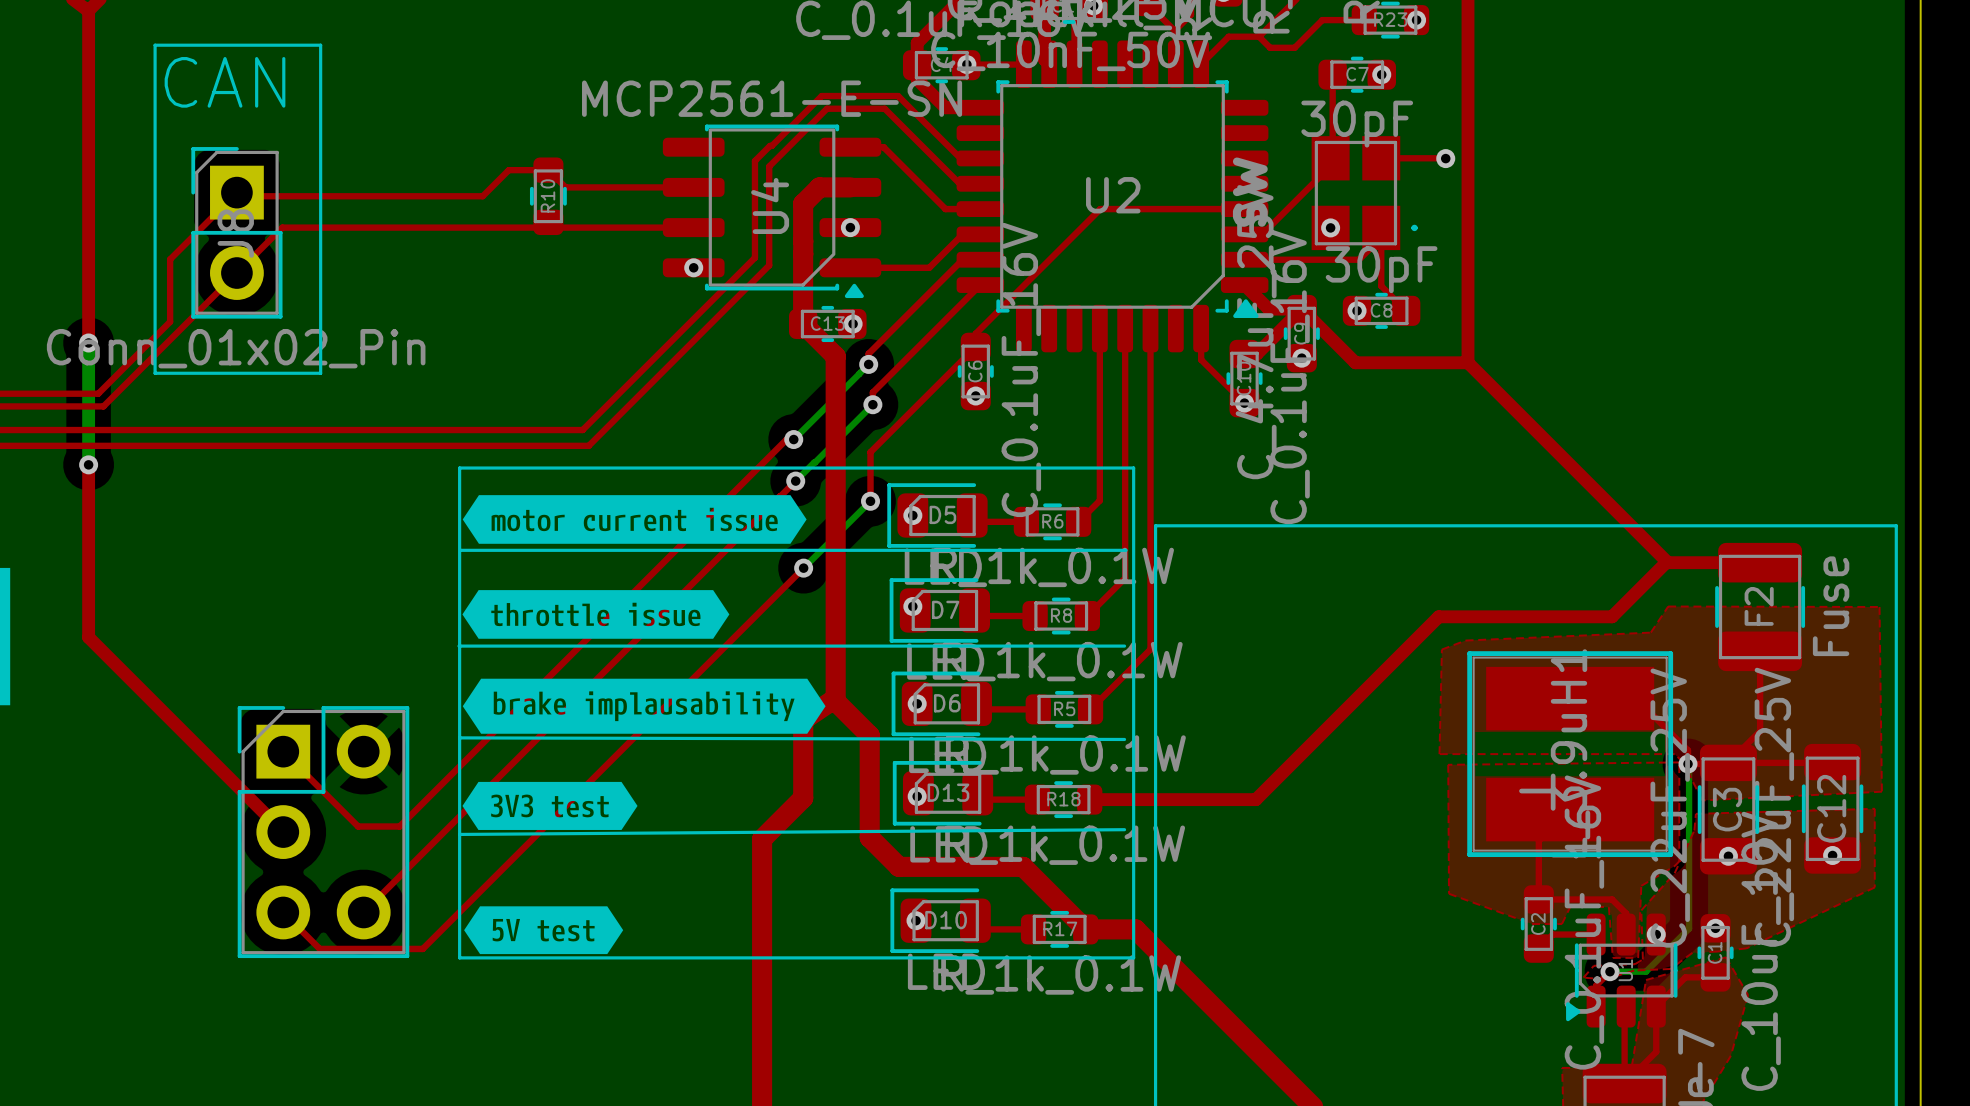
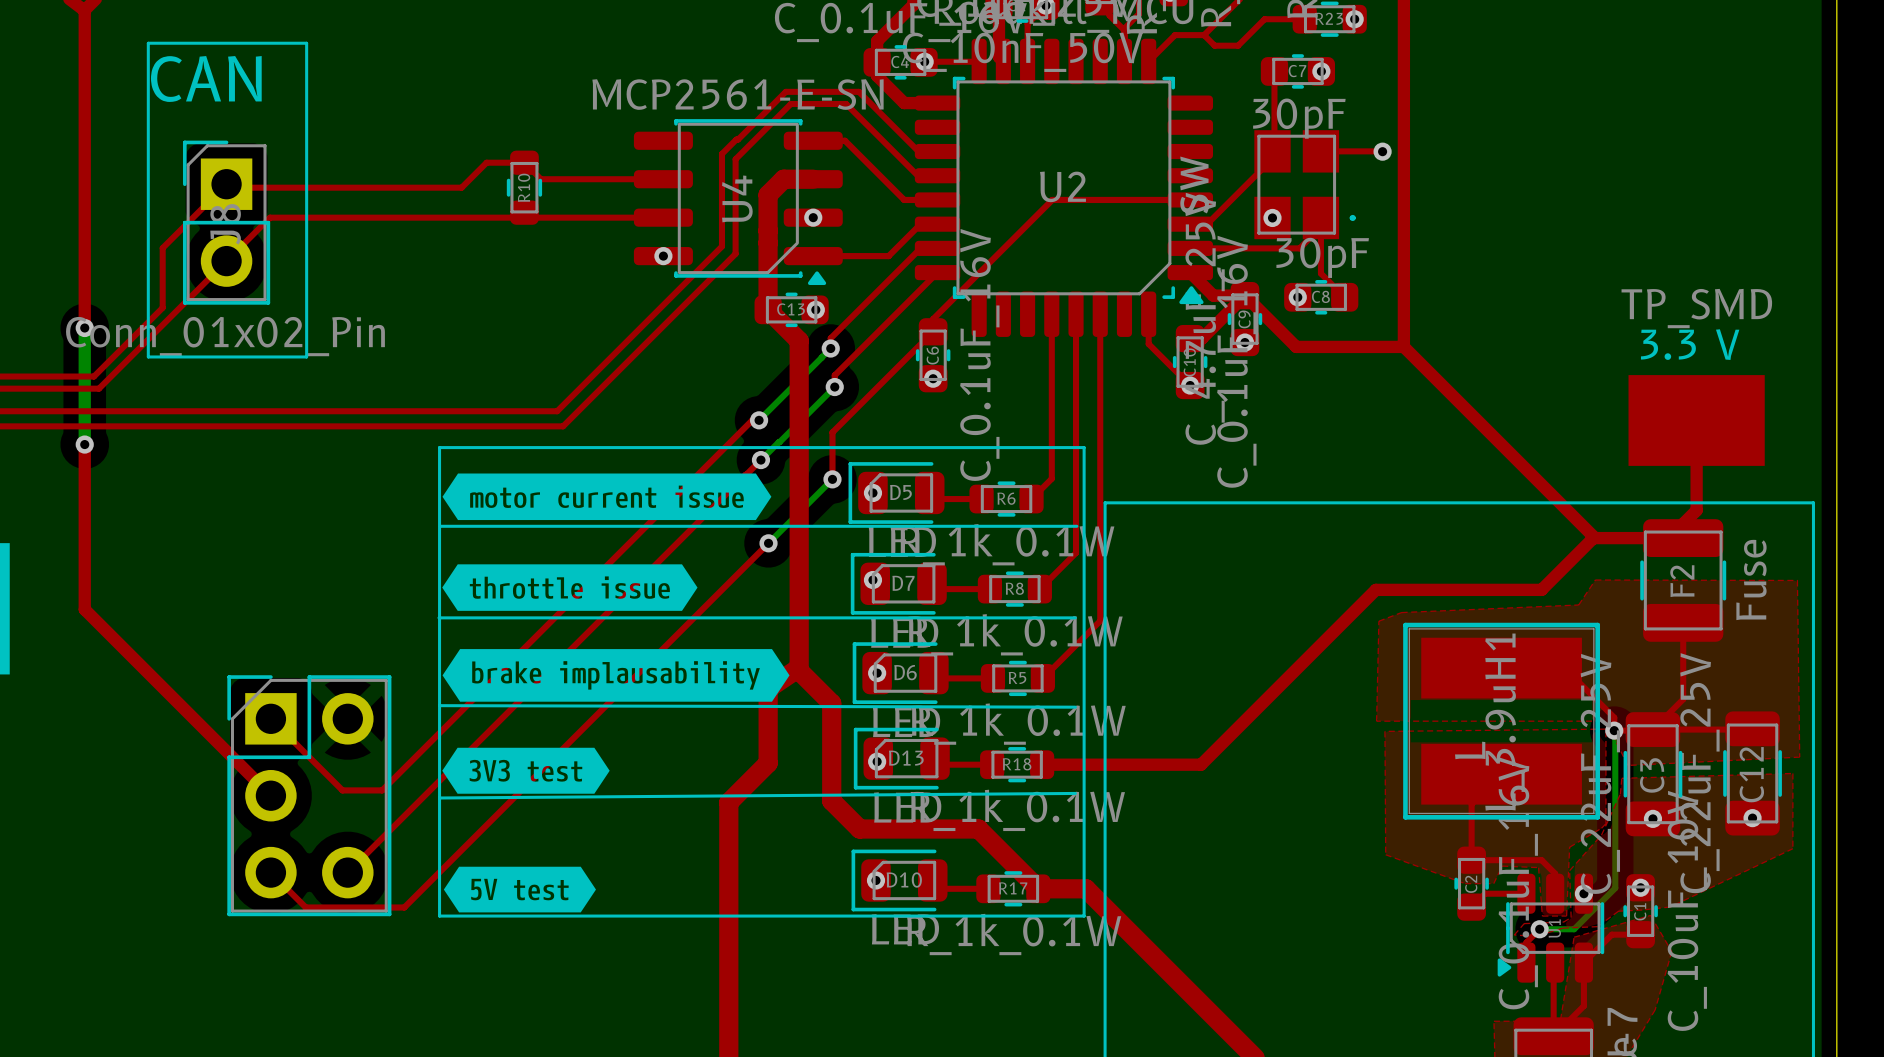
text: none -> 3.3 V (1690, 344)
top track: none -> (1696, 420) (1696, 510) (1683, 523) (1683, 538)
part: none -> TP_SMD (1696, 420)

